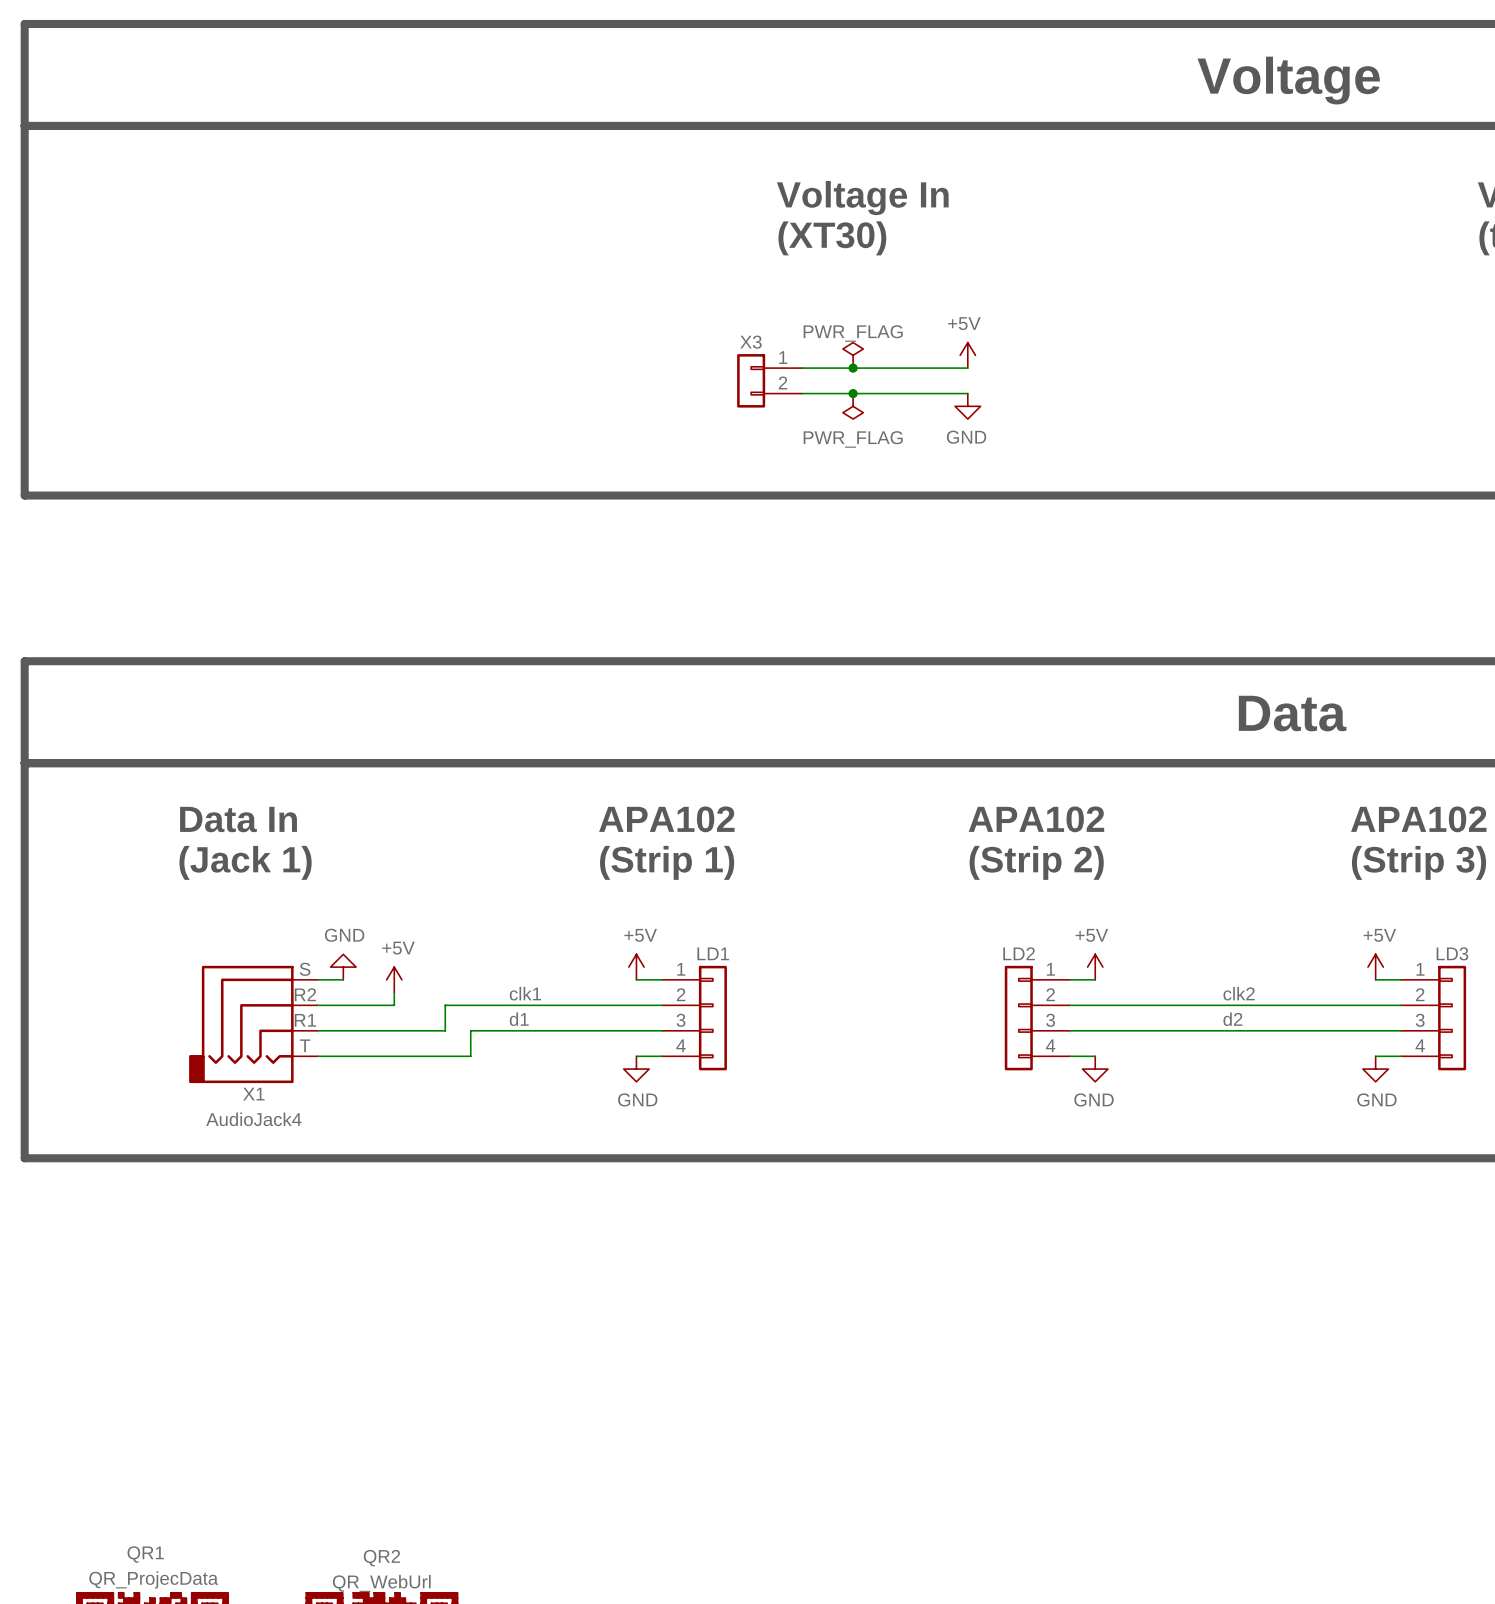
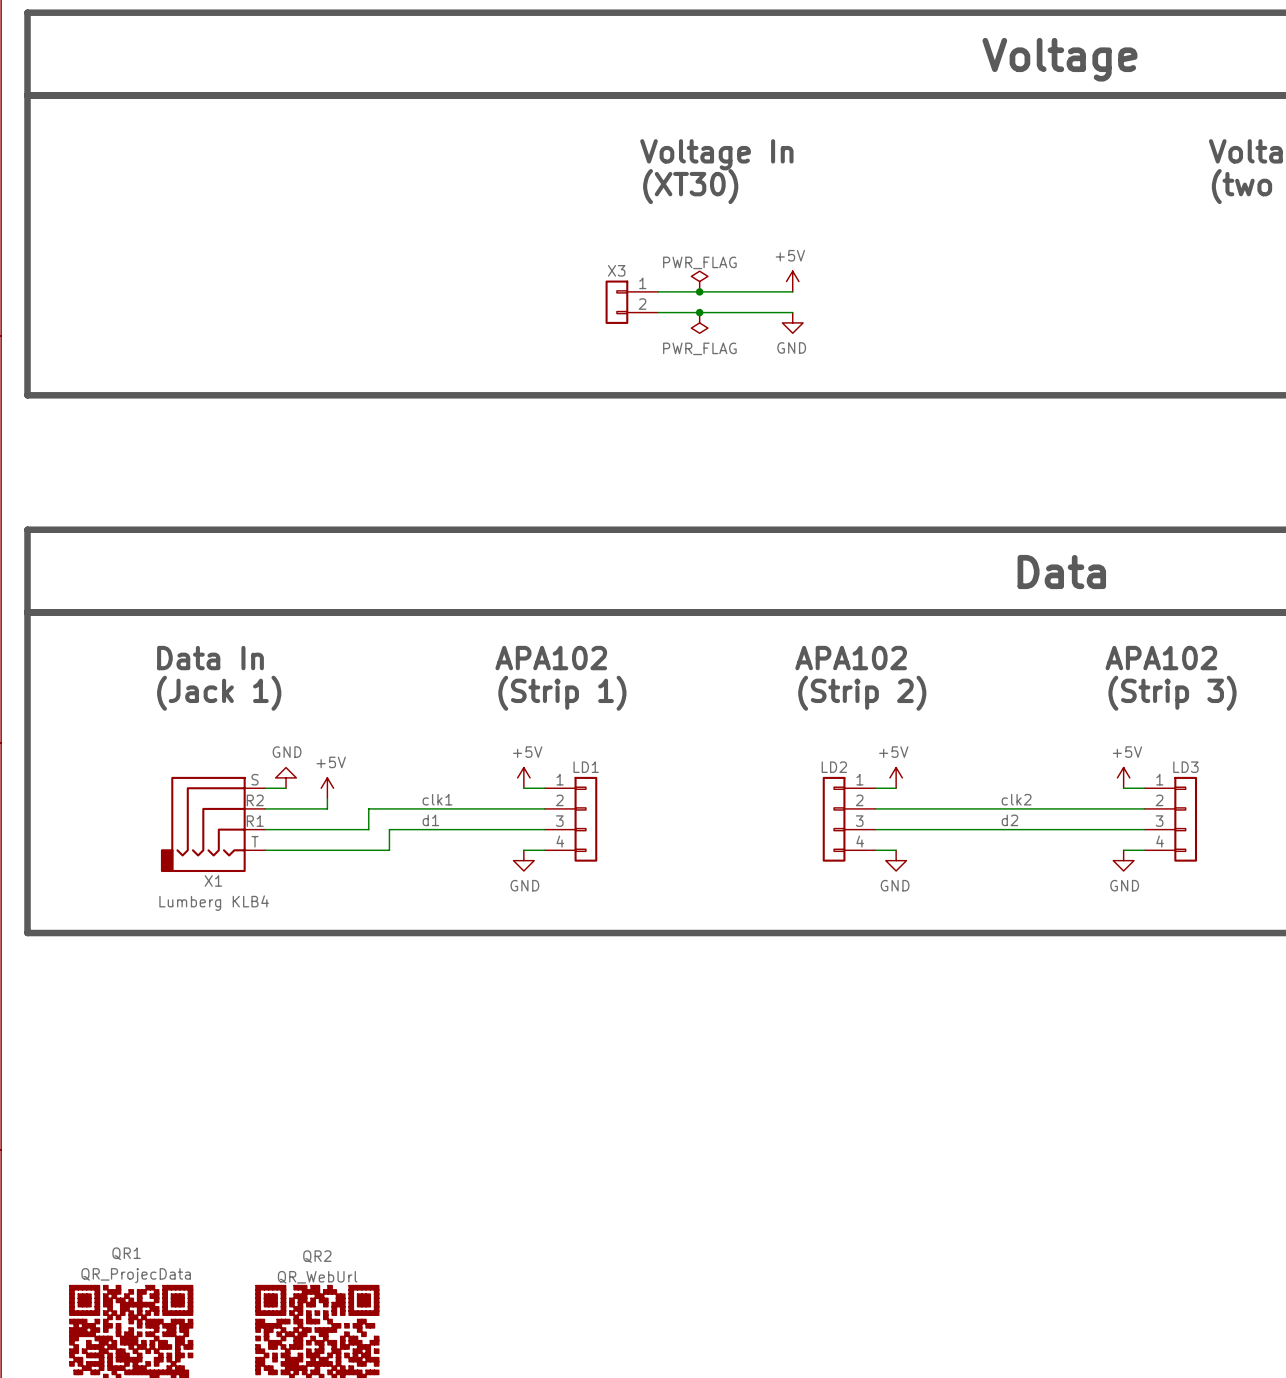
X1 value: AudioJack4 (253, 1119) -> Lumberg KLB4 (214, 903)

